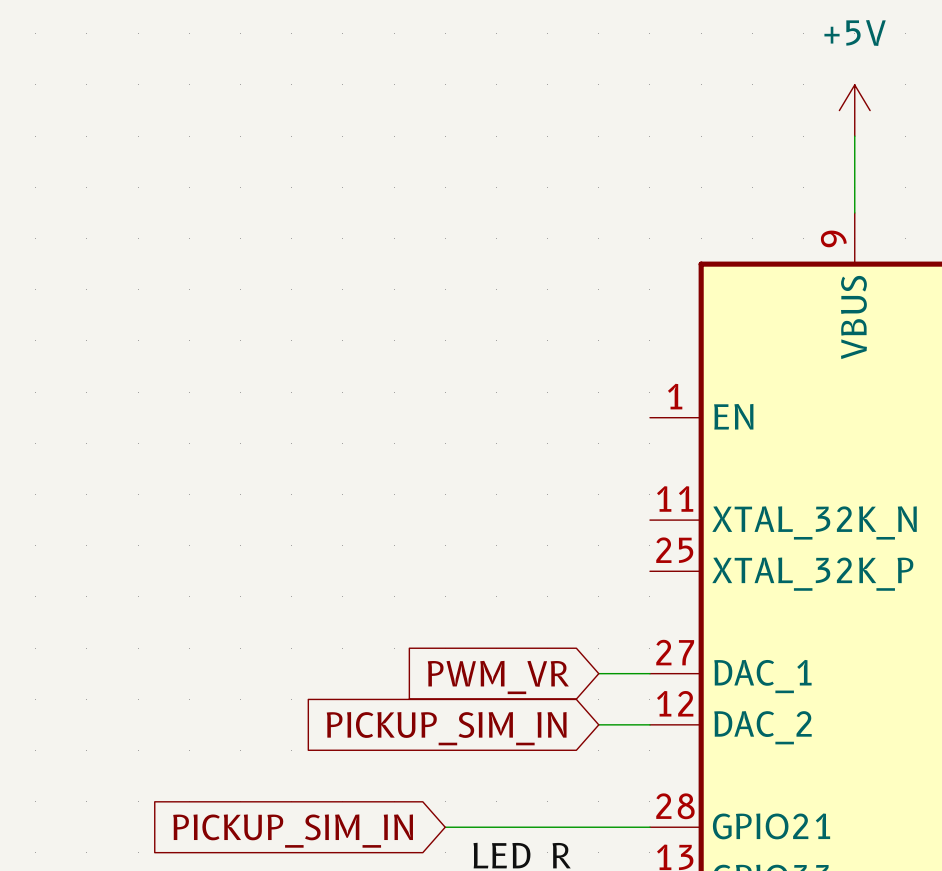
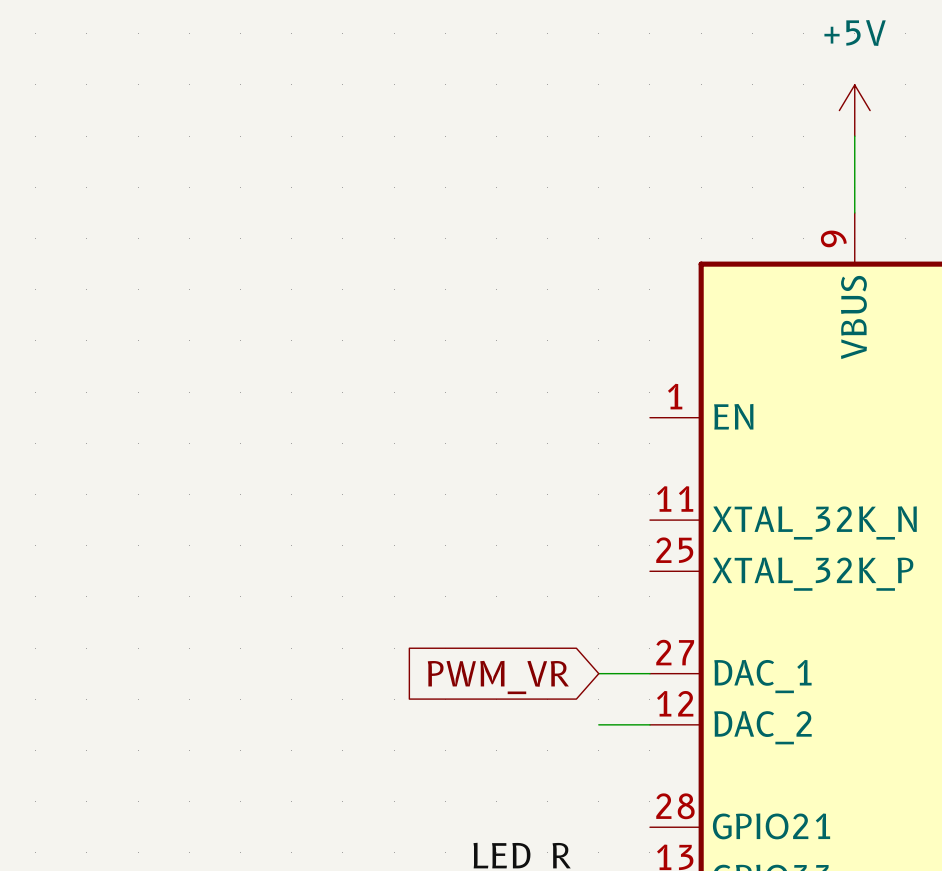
global label: PICKUP_SIM_IN (446, 728) -> none
wire: (445, 827) (649, 827) -> none
global label: PICKUP_SIM_IN (293, 831) -> none

